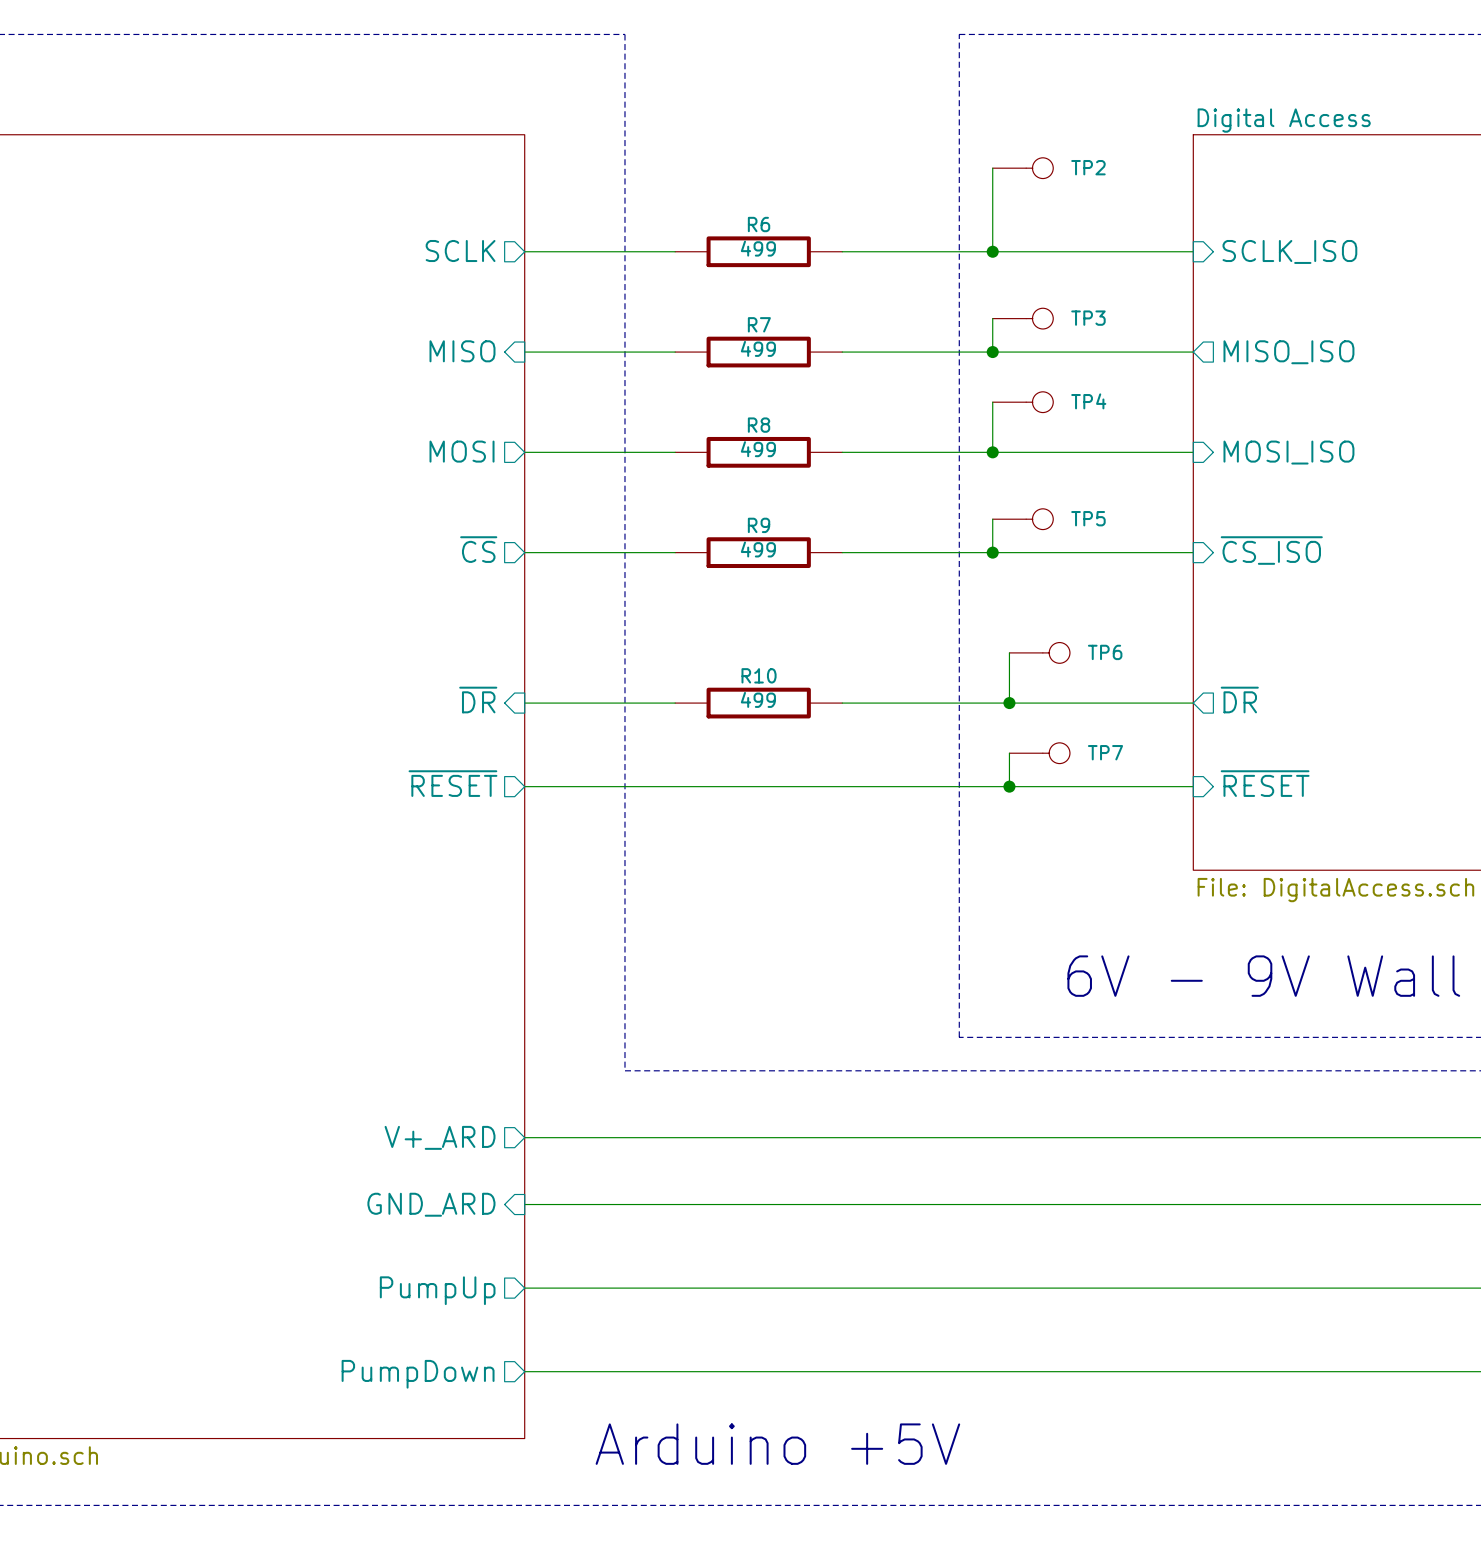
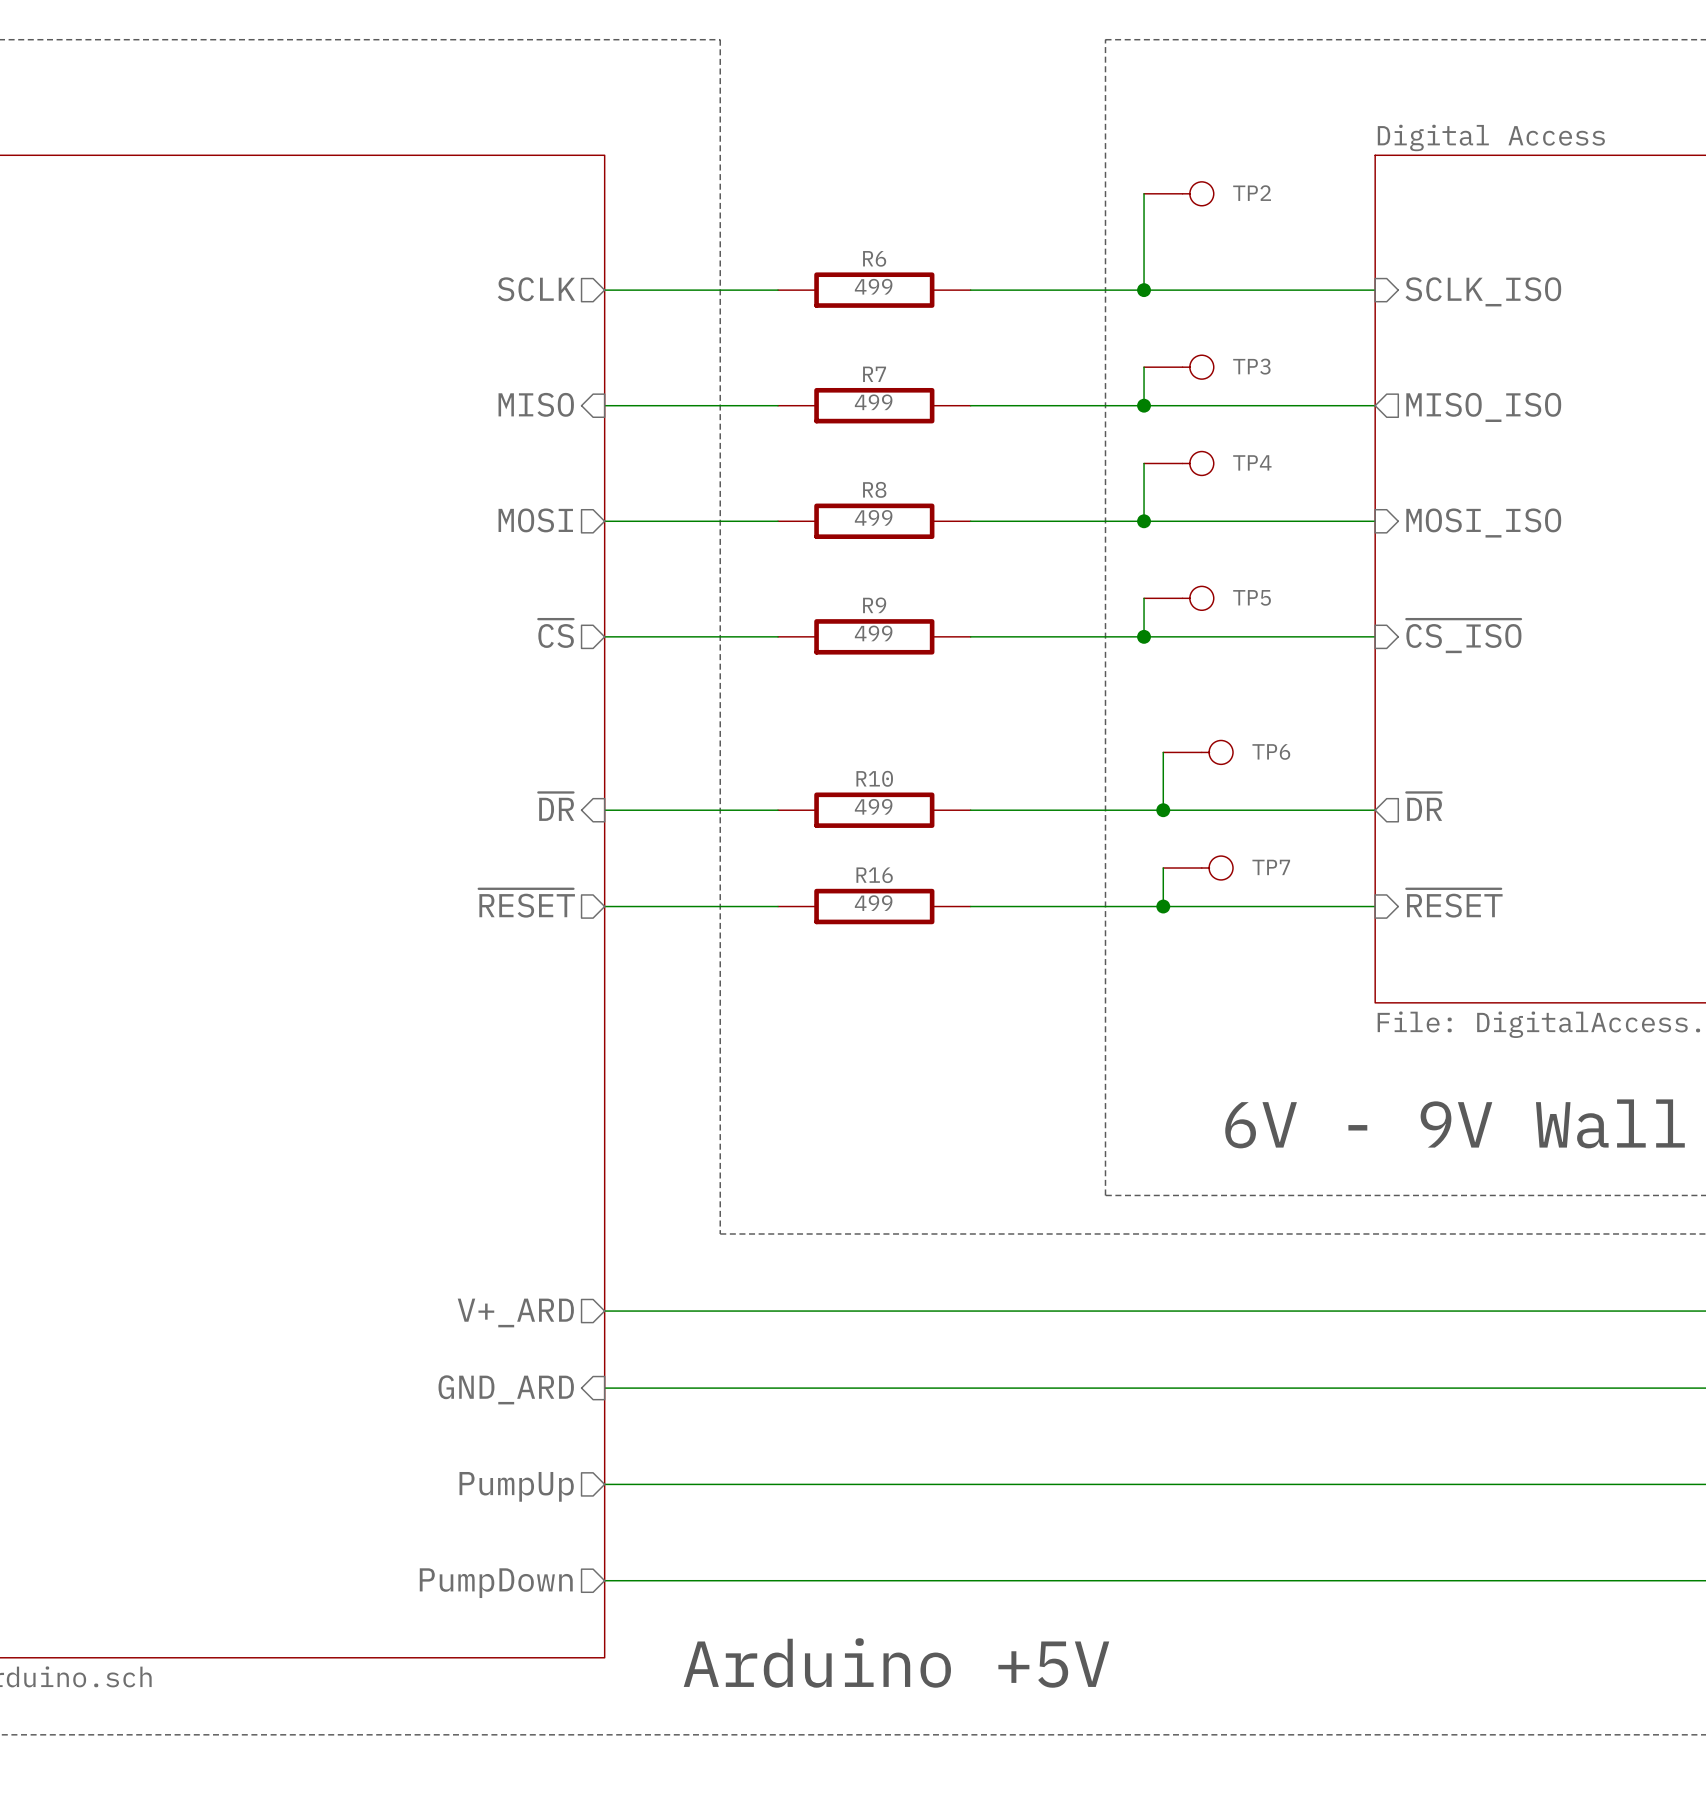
wire: (675, 786) (842, 786) -> none
R16: none -> 499 (874, 906)

